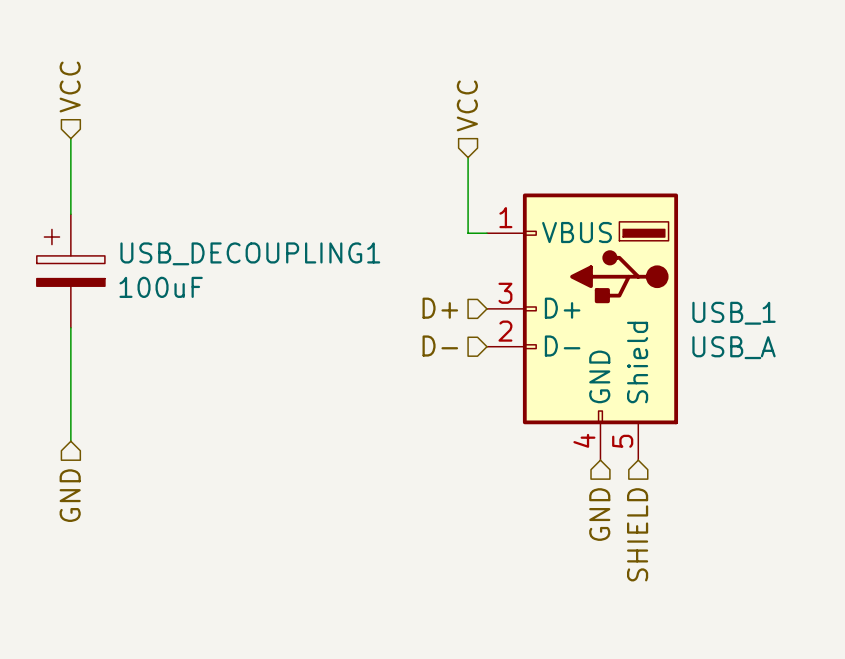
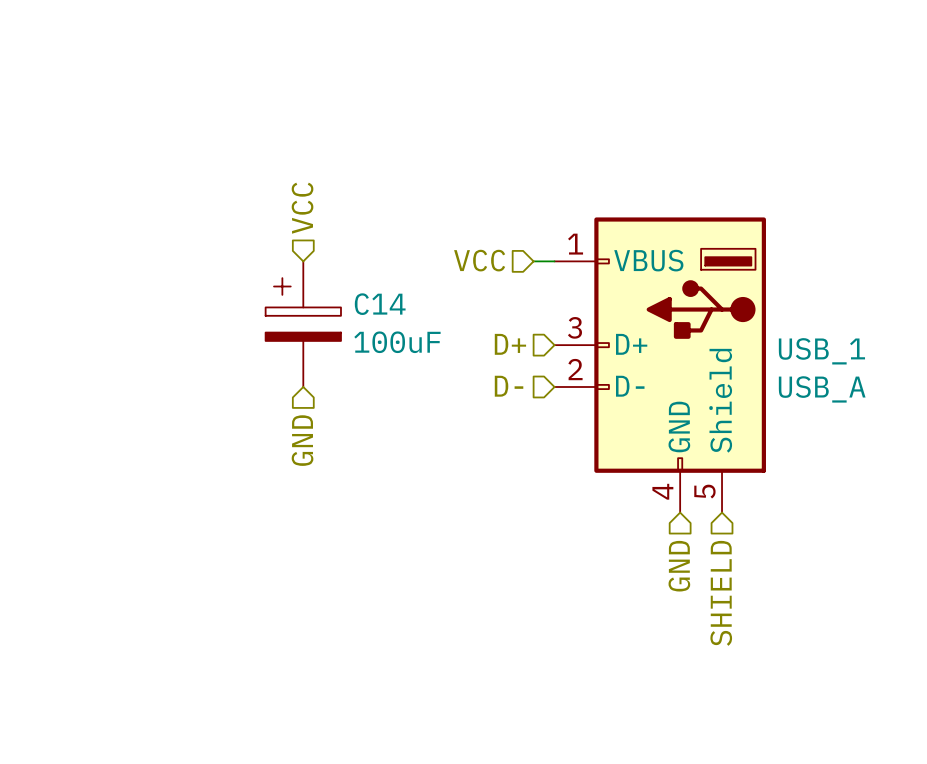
hierarchical label: VCC (70, 87) -> none
hierarchical label rotation: 0° (467, 105) -> 90° counterclockwise (479, 260)
hierarchical label position: VCC (467, 105) -> VCC (479, 260)
wire: (70, 138) (70, 214) -> none
wire: (468, 157) (468, 233) -> none
hierarchical label: none -> VCC (302, 208)
USB_DECOUPLING1: 100uF (70, 271) -> none
C14: none -> 100uF (303, 324)
wire: (70, 327) (70, 441) -> none
hierarchical label position: GND (70, 495) -> GND (302, 440)

